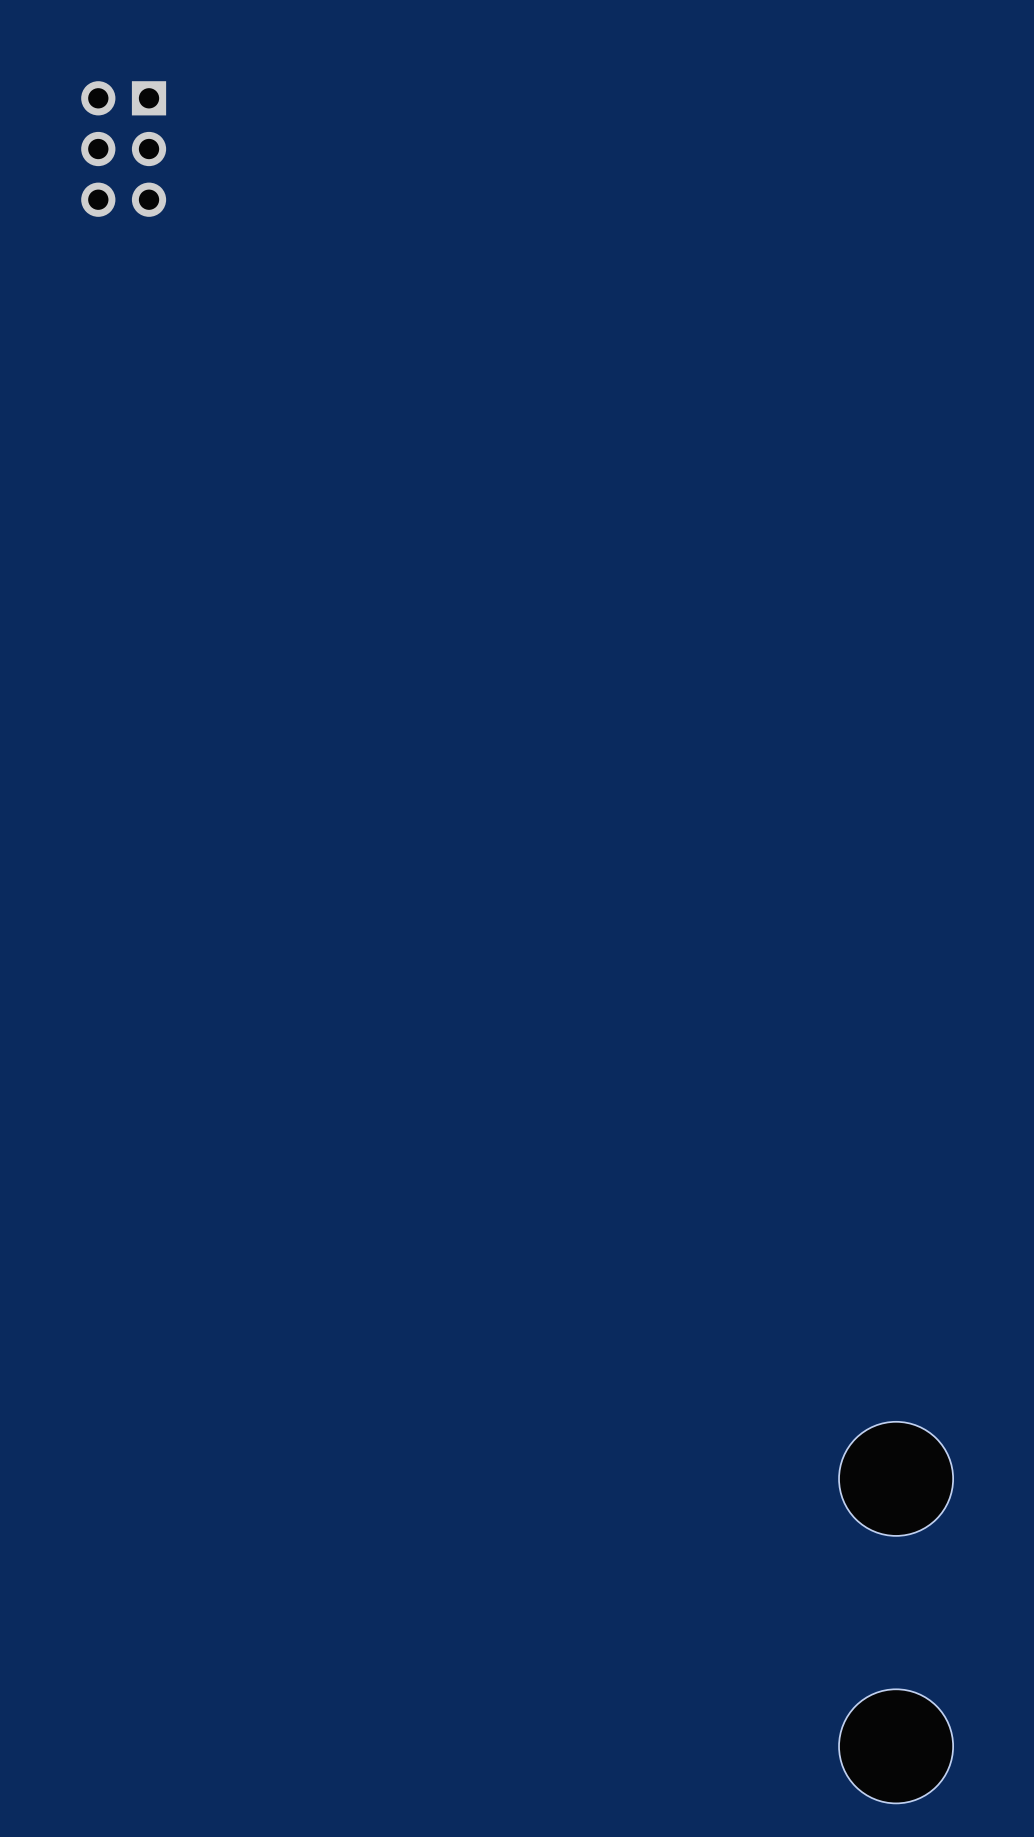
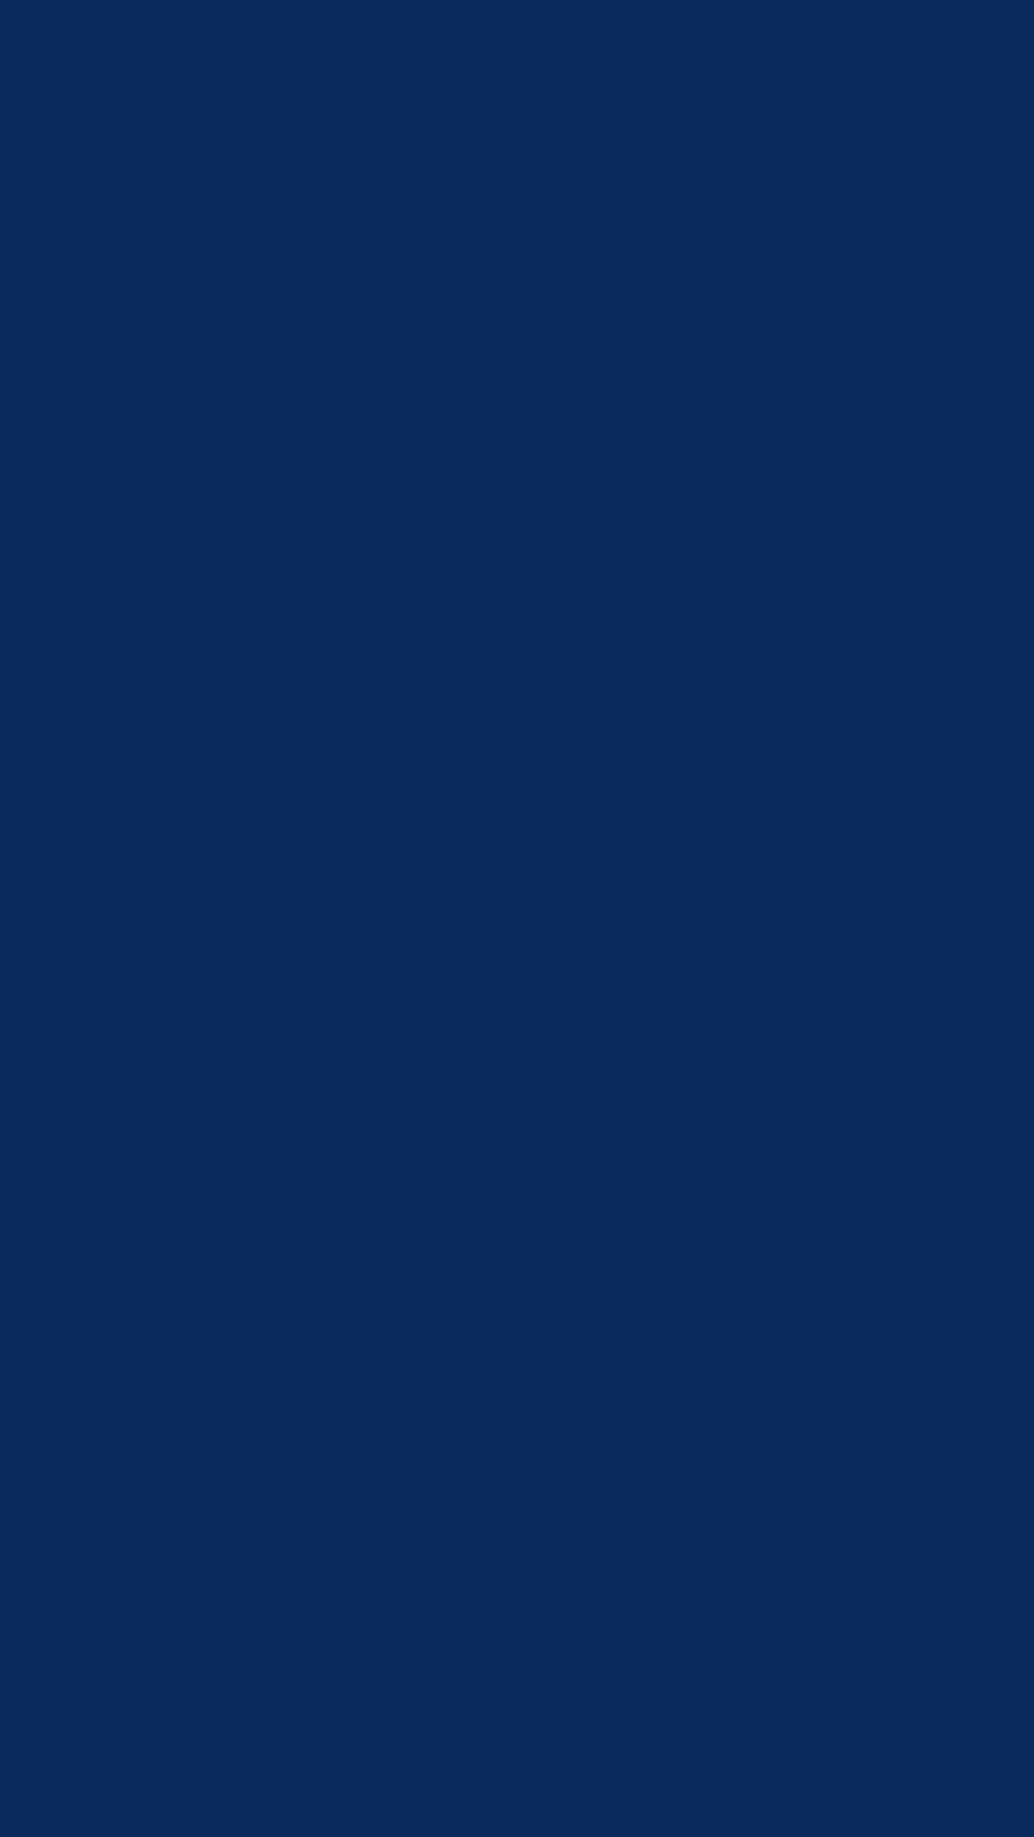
part: (123, 149) -> none
part: (896, 1478) -> none
part: (896, 1746) -> none

